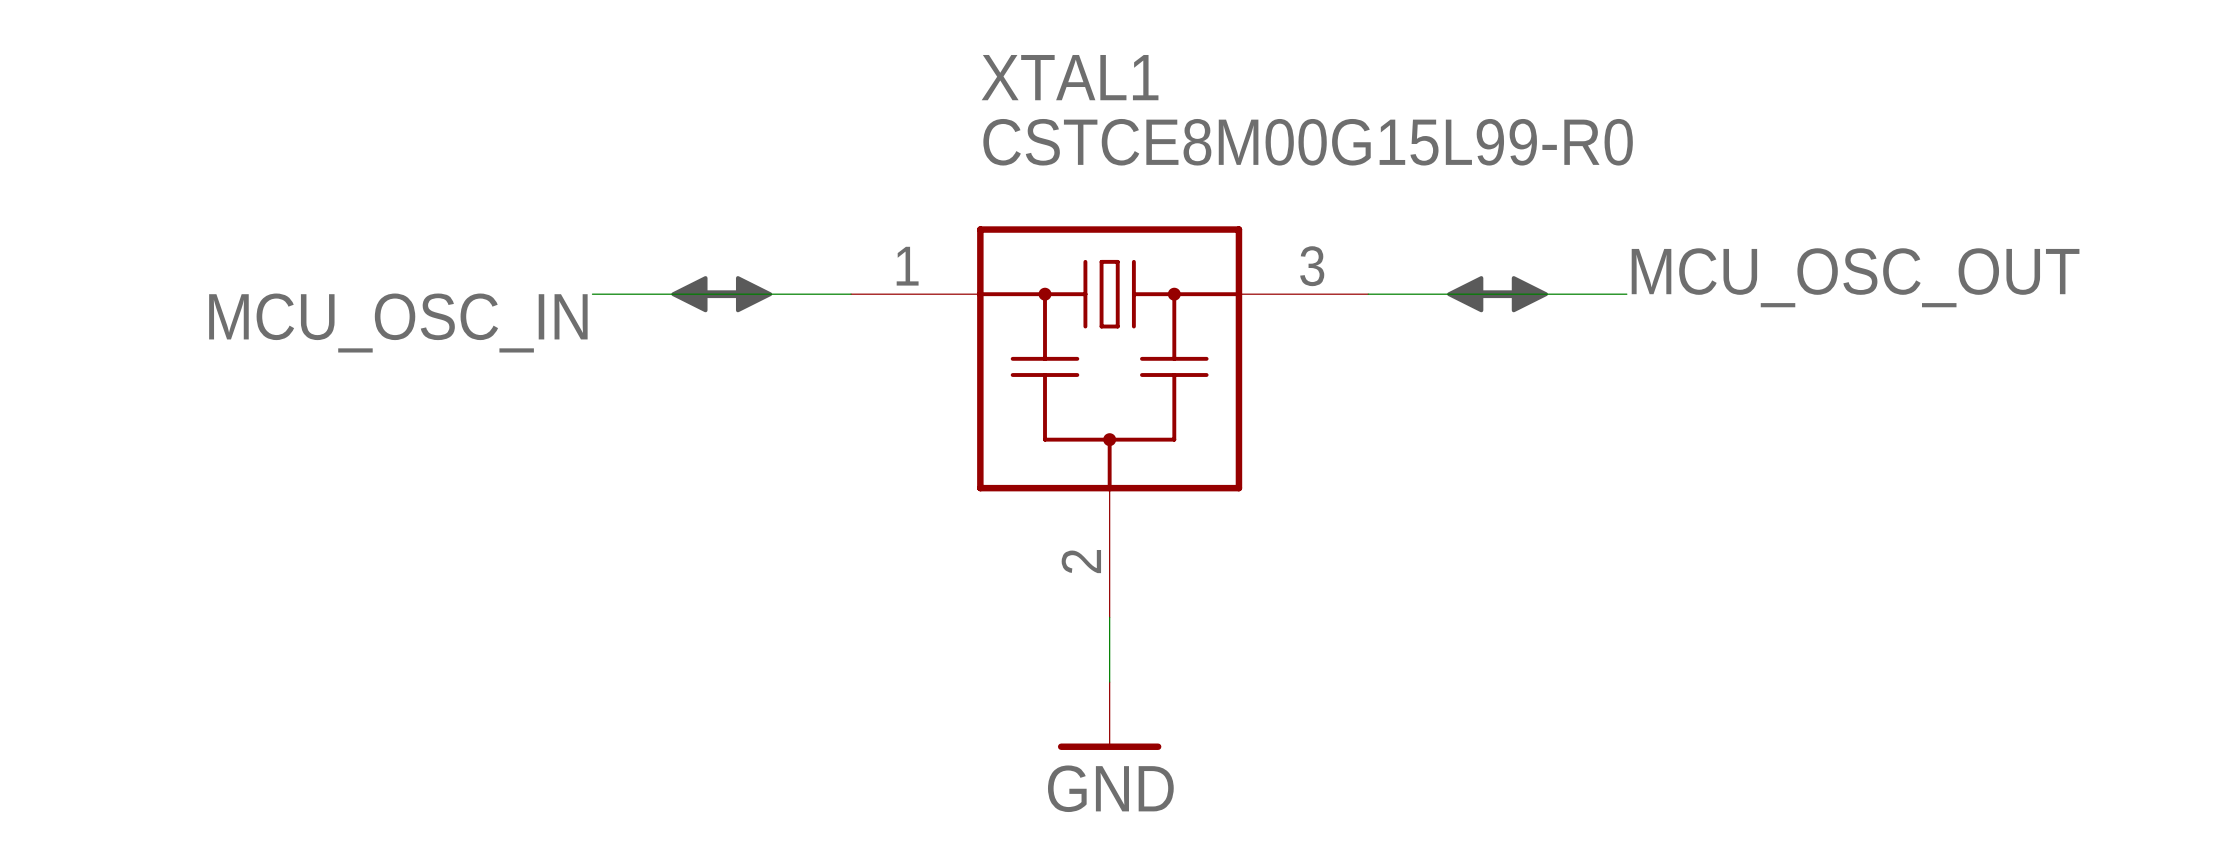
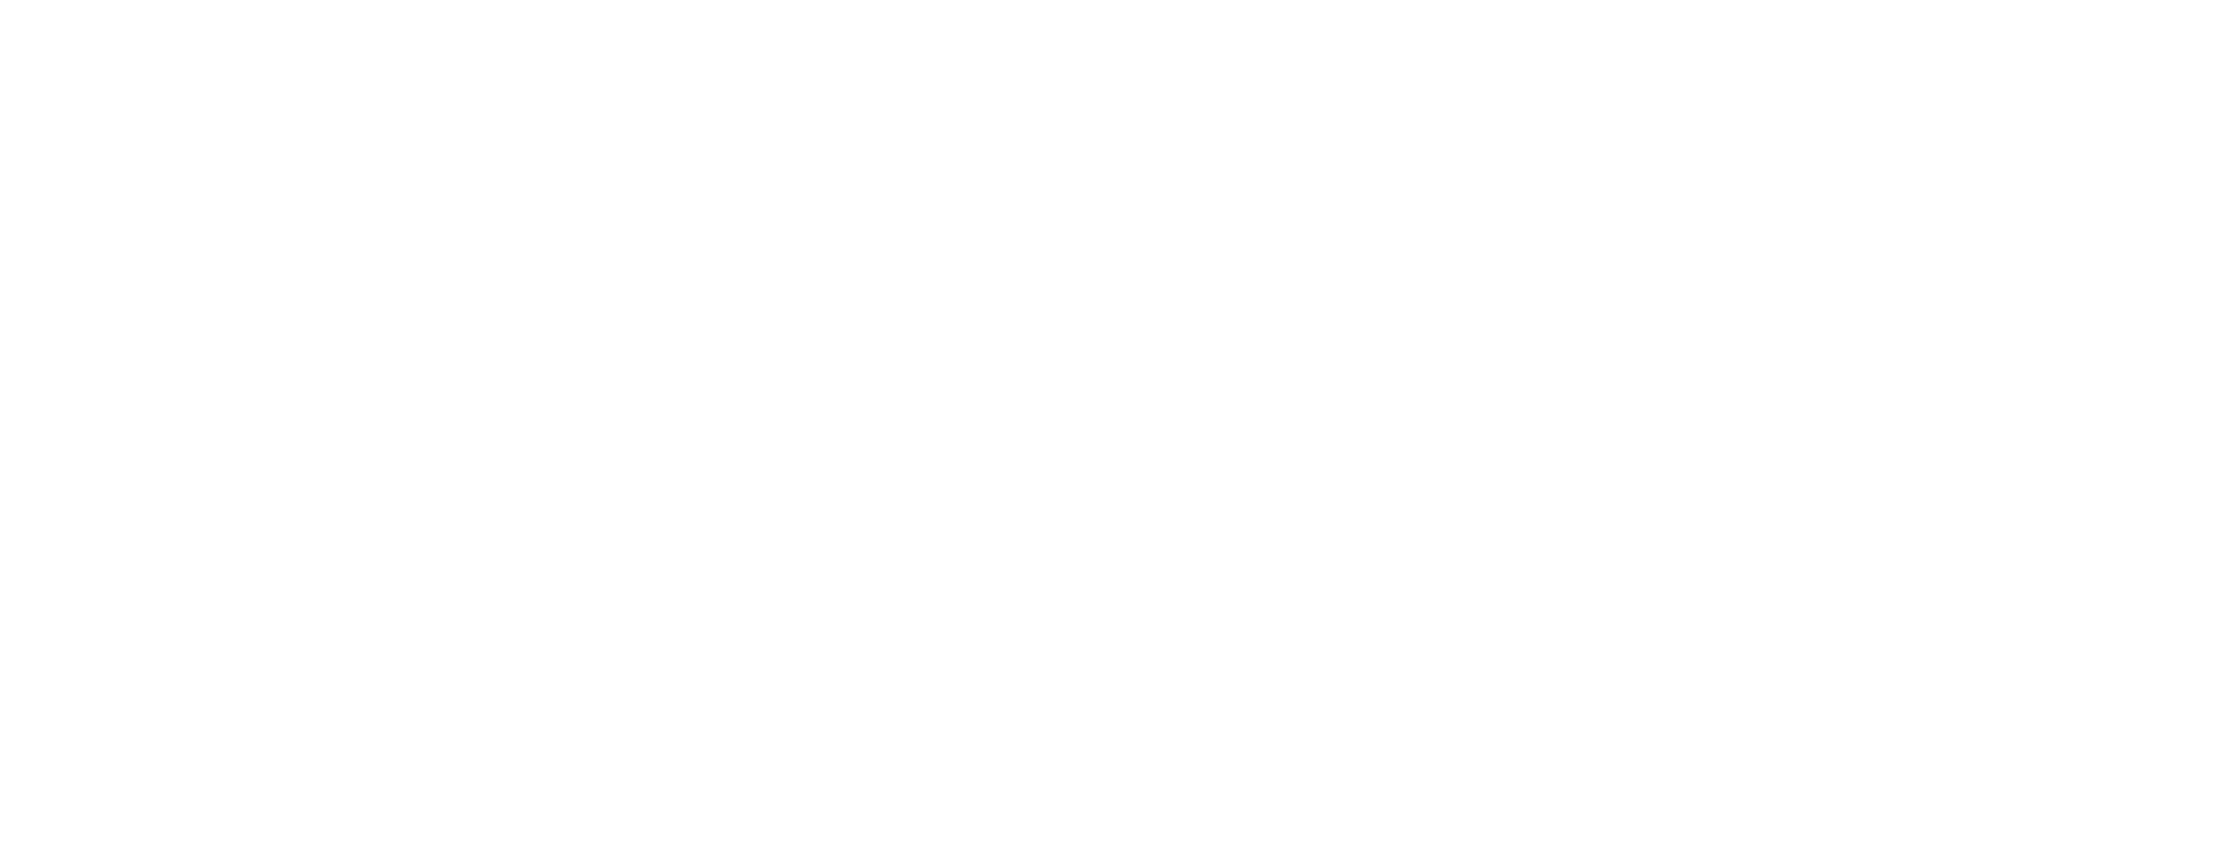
label: MCU_OSC_OUT (1855, 277) -> none
wire: (592, 294) (851, 294) -> none
part: (721, 294) -> none
wire: (1368, 294) (1626, 294) -> none
part: (1497, 294) -> none
label: MCU_OSC_IN (398, 323) -> none
XTAL1: CSTCE8M00G15L99-R0 (1109, 421) -> none
wire: (1109, 617) (1109, 682) -> none
power symbol: GND (1109, 716) -> none

